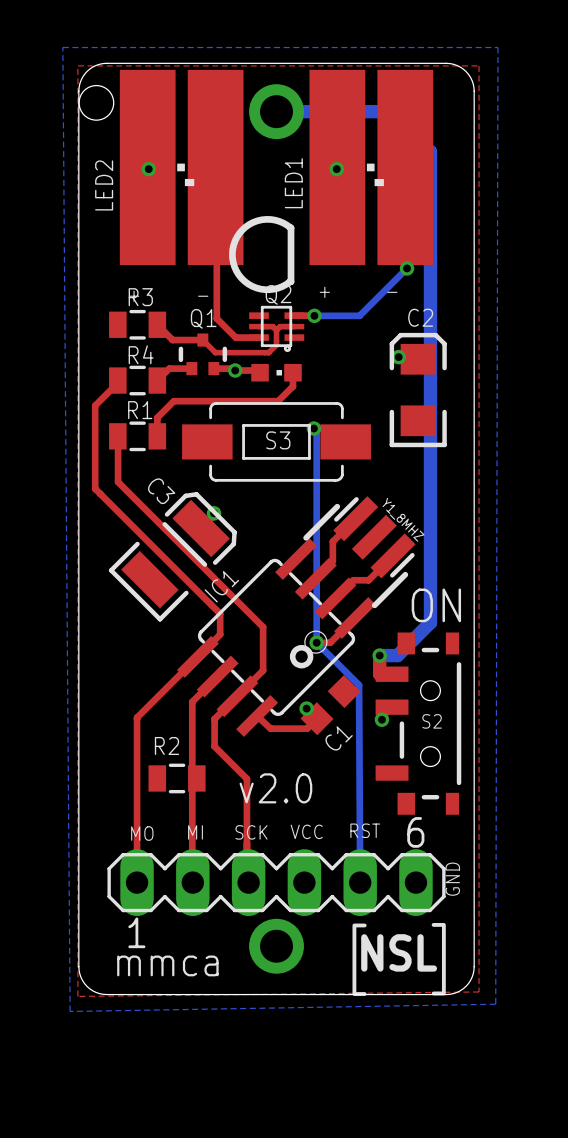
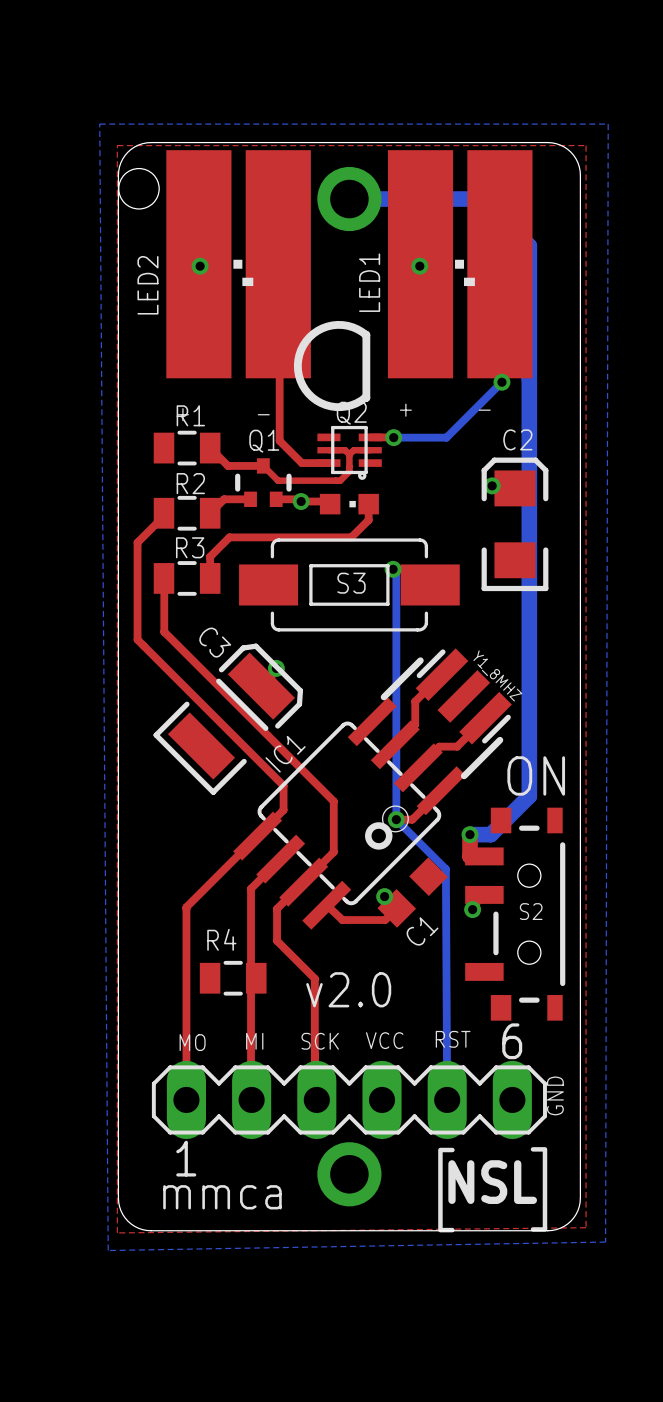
R3 name: R3 (140, 297) -> R1 (190, 415)
R4 name: R4 (141, 354) -> R2 (190, 483)
R1 name: R1 (140, 410) -> R3 (190, 547)
R2 name: R2 (166, 745) -> R4 (221, 939)

